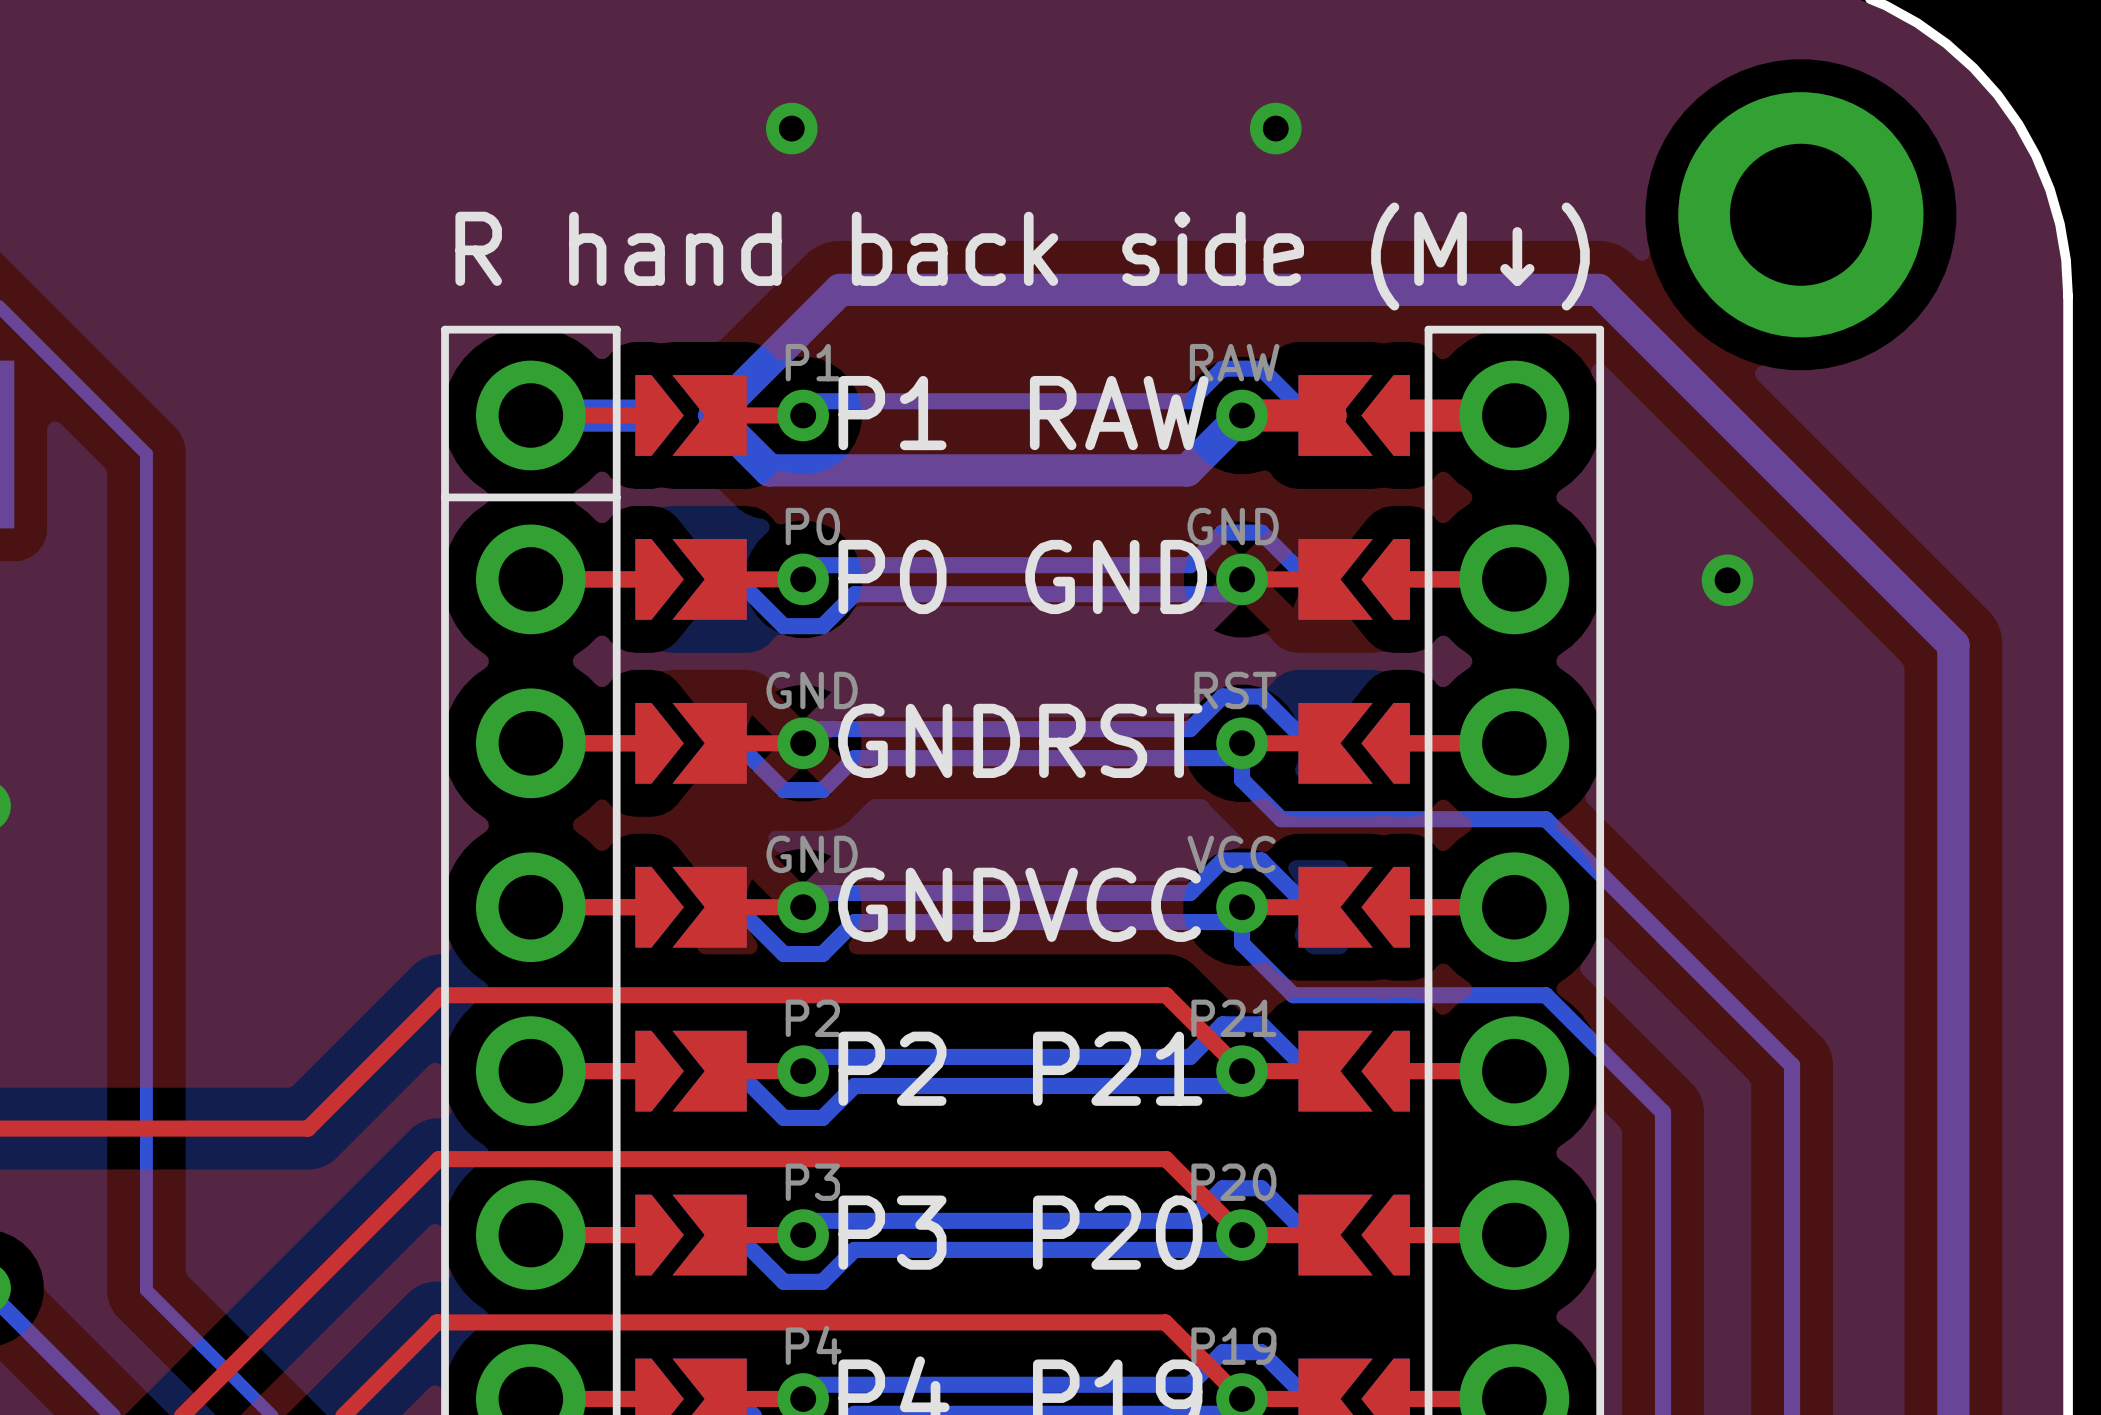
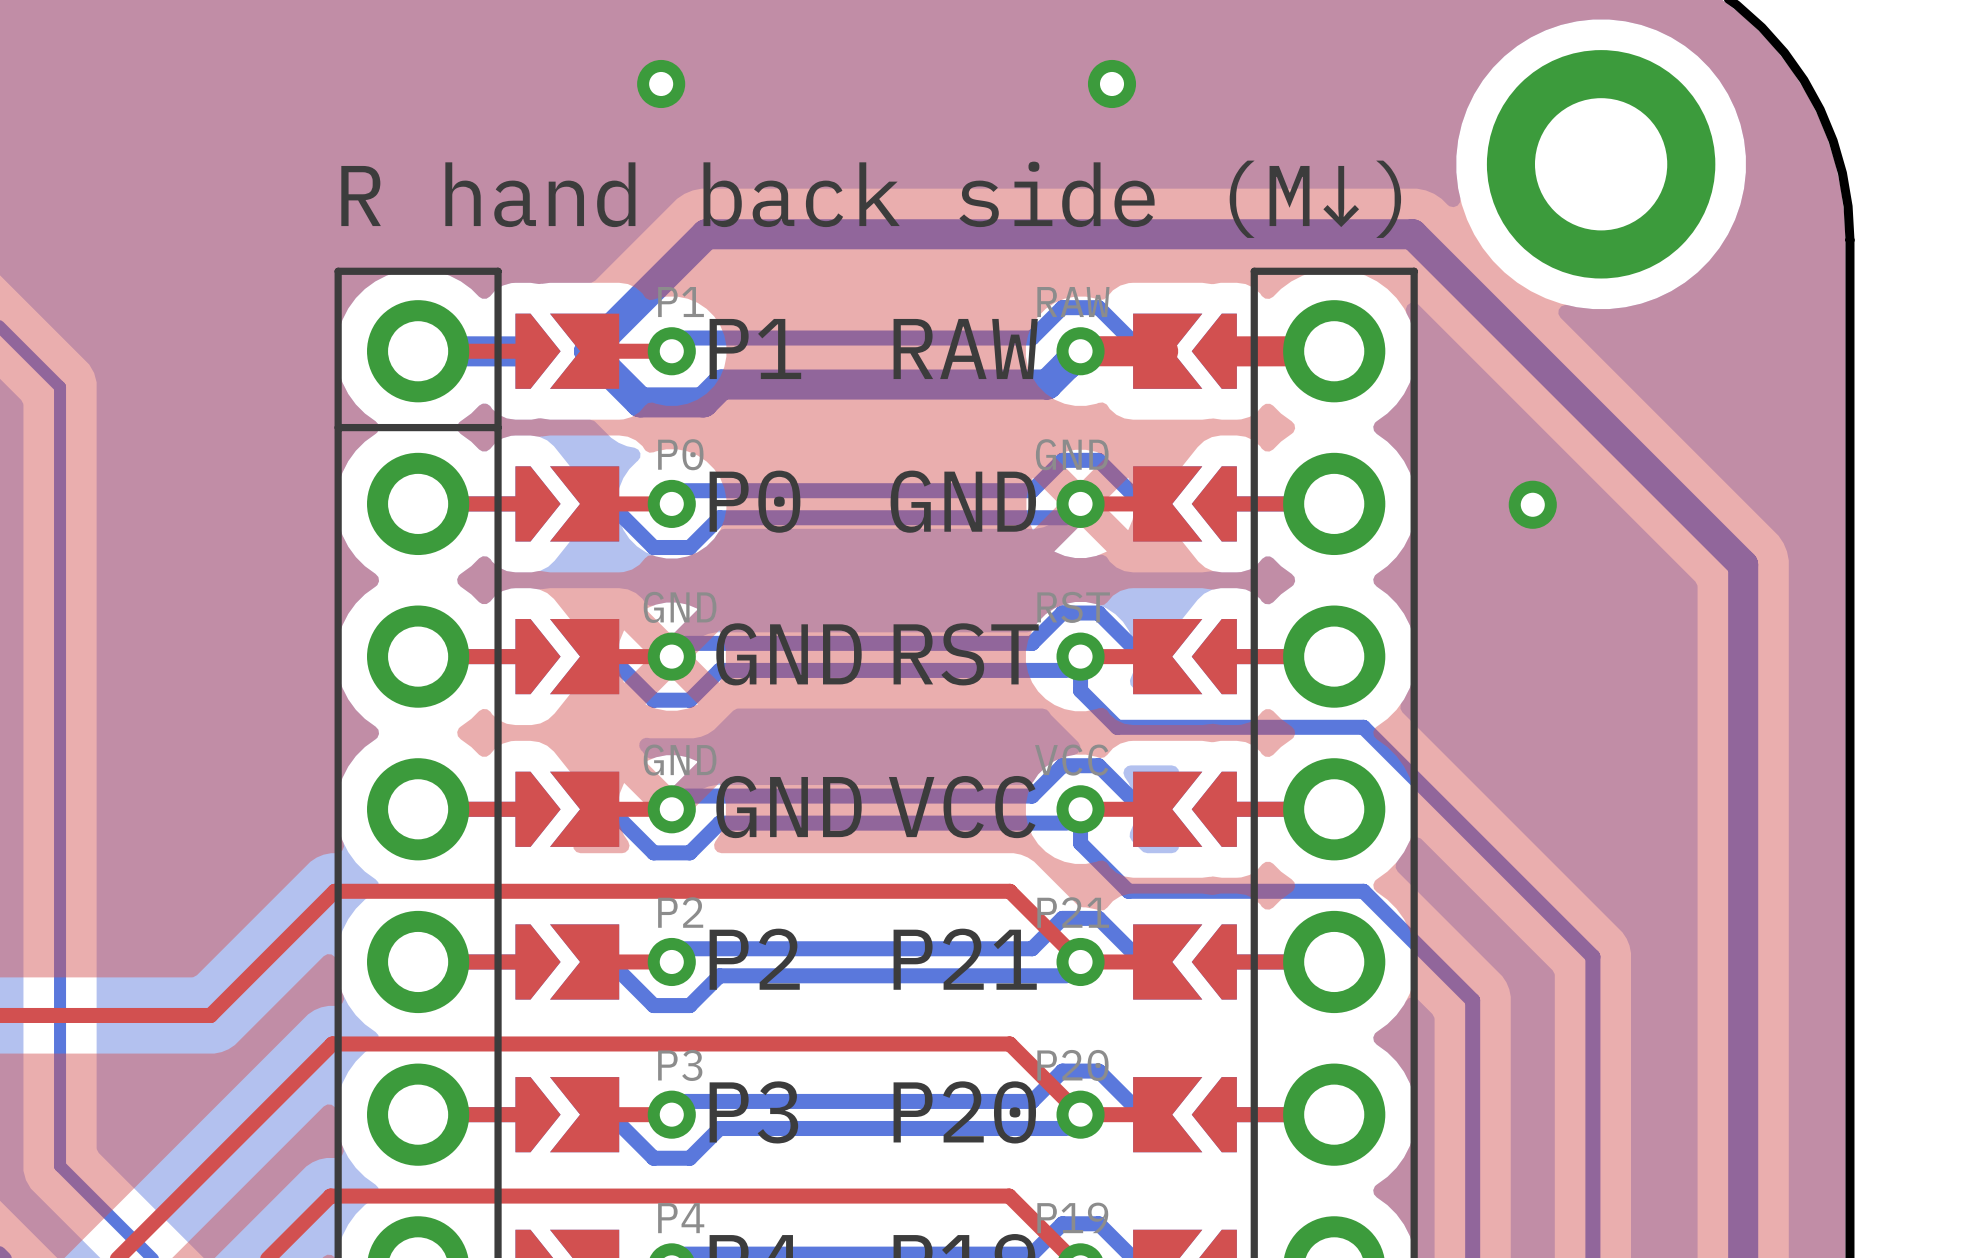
bottom track: (1206, 451) (1187, 470) (837, 470) -> (1047, 384) (721, 384) (703, 402)

